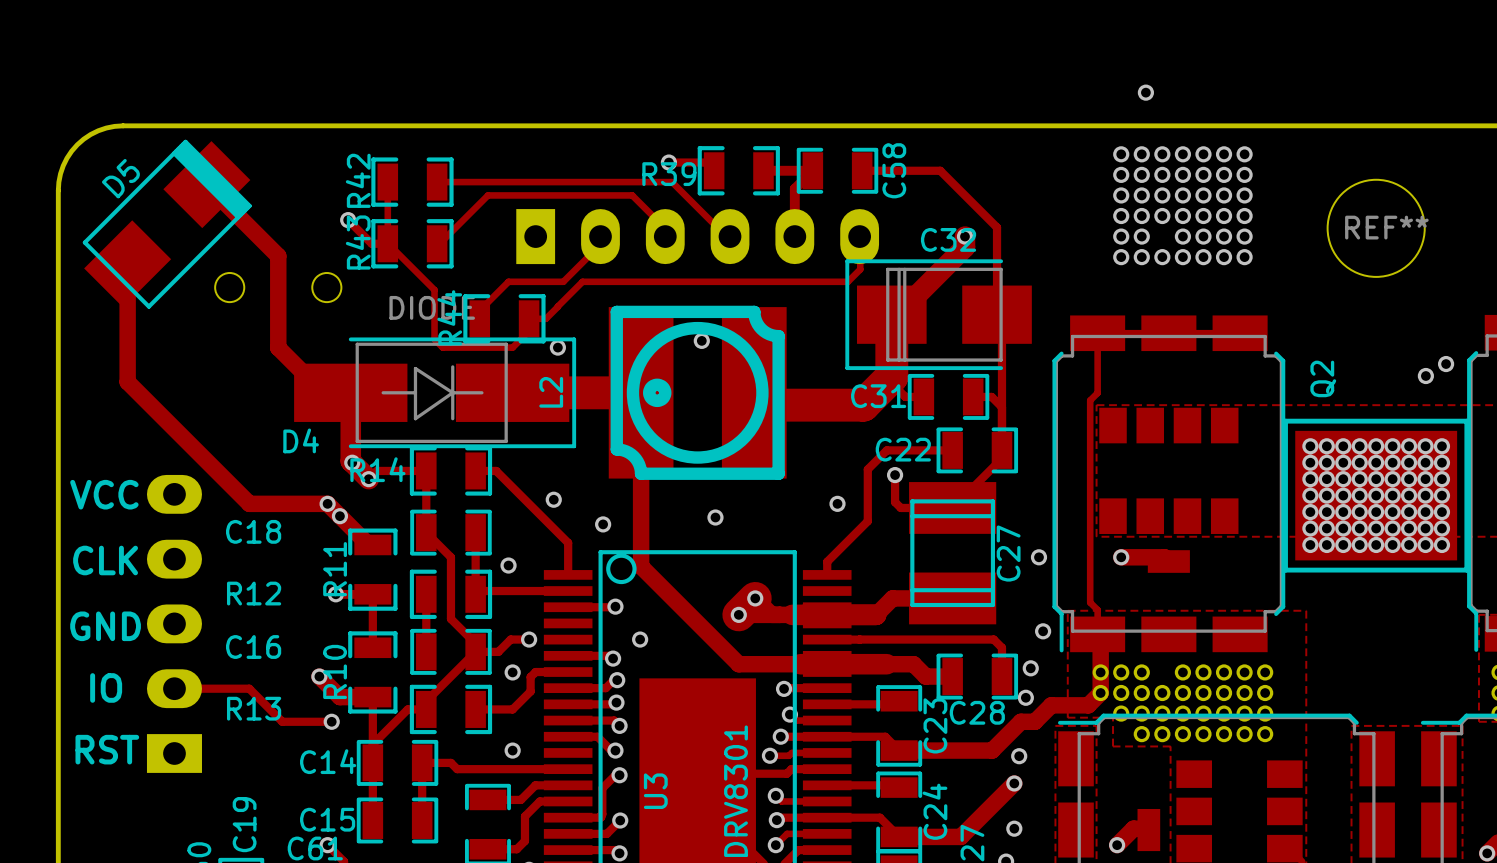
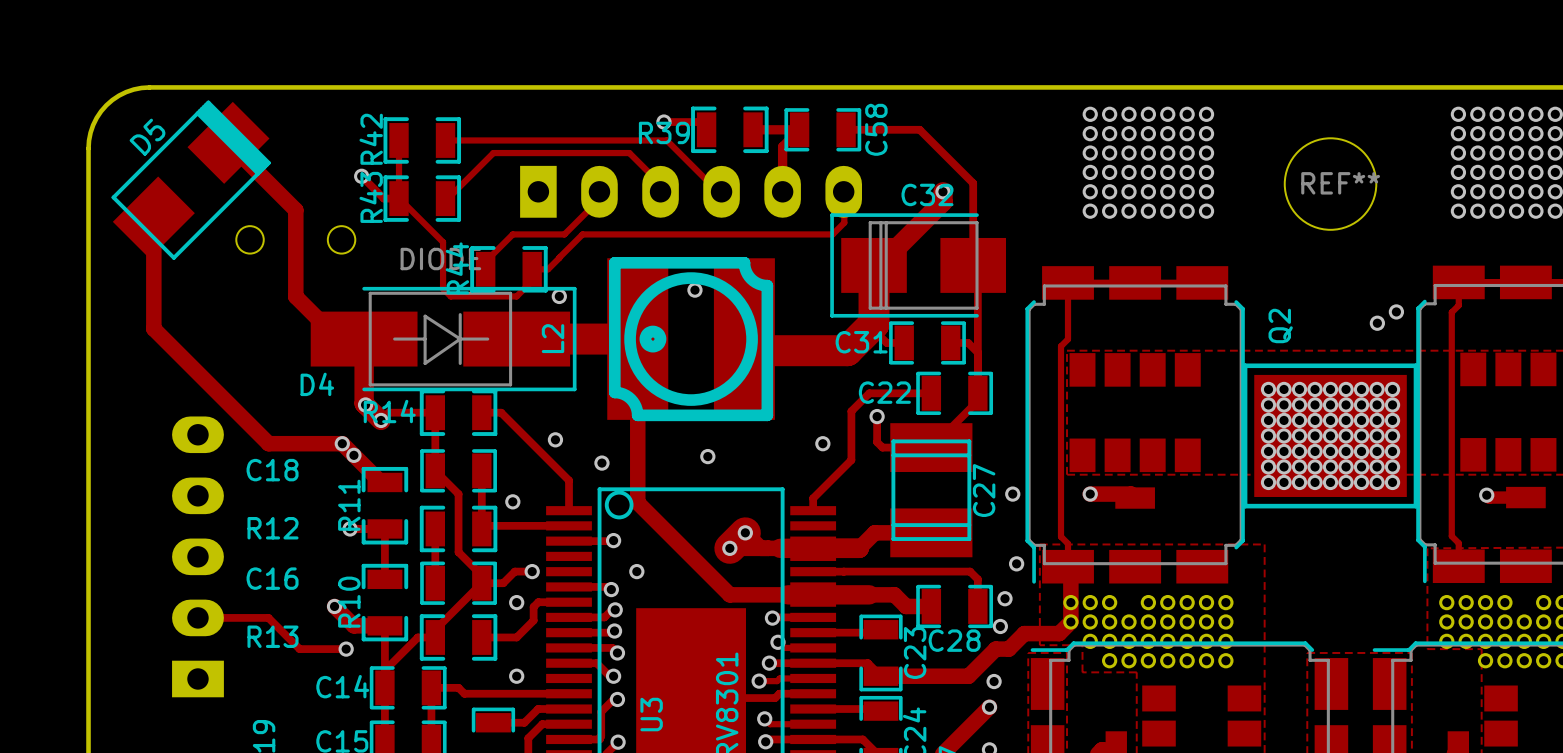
via position: (1145, 92) -> (1129, 191)
text: VCC (104, 494) -> none
text: CLK (105, 560) -> none
text: GND (105, 626) -> none
text: IO (106, 687) -> none
text: RST (107, 749) -> none

